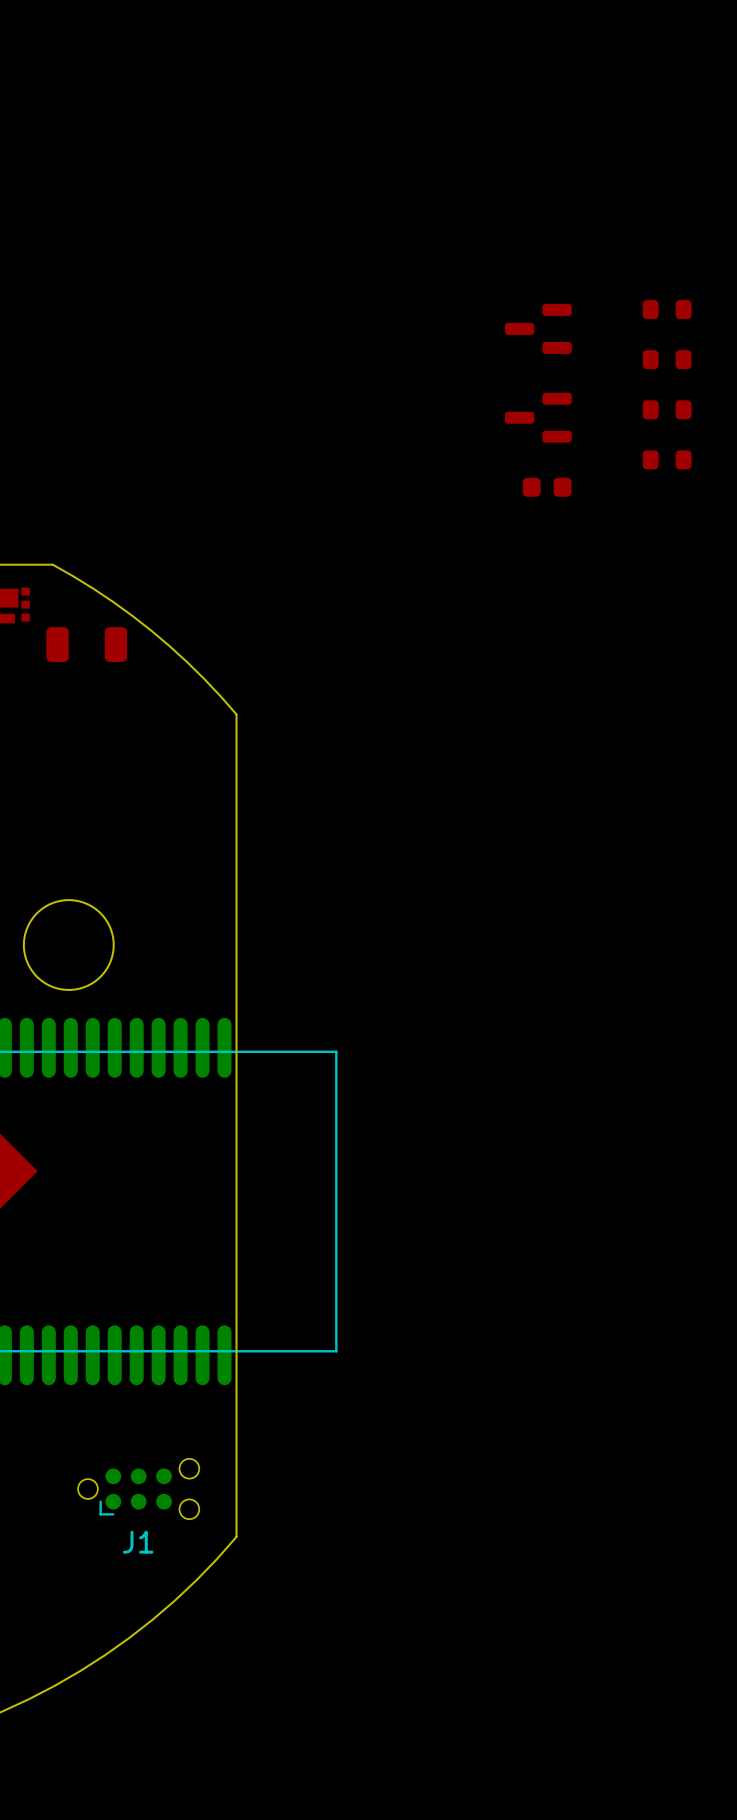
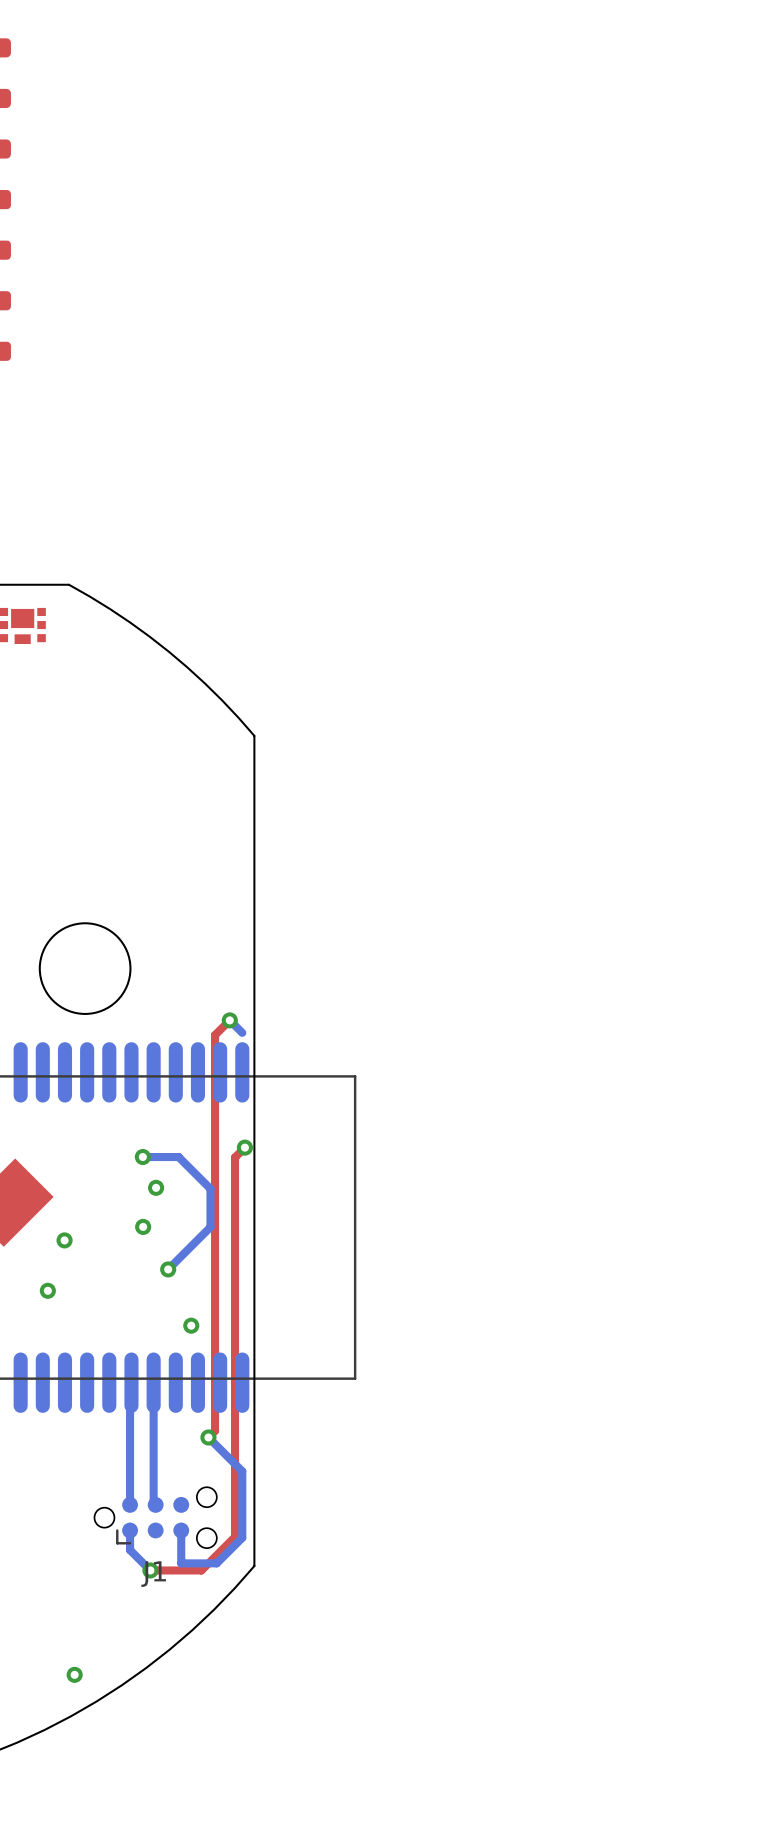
part: (667, 309) -> none
part: (538, 328) -> none
part: (667, 359) -> none
part: (667, 409) -> none
part: (538, 417) -> none
part: (667, 459) -> none
part: (547, 487) -> none
part: (86, 644) -> none
top track: none -> (229, 1020) (215, 1035) (215, 1430) (208, 1437)
bottom track: none -> (229, 1020) (242, 1032)
via: none -> (229, 1020)
top track: none -> (244, 1147) (235, 1157) (235, 1536) (201, 1570) (150, 1570)
via: none -> (244, 1147)
bottom track: none -> (142, 1157) (178, 1157) (210, 1188) (210, 1227) (168, 1269)
via: none -> (142, 1157)
via: none -> (156, 1187)
via: none -> (143, 1226)
via: none -> (64, 1240)
via: none -> (168, 1269)
via: none -> (47, 1290)
via: none -> (191, 1325)
bottom track: none -> (131, 1382) (130, 1504)
bottom track: none -> (153, 1382) (153, 1502) (155, 1504)
bottom track: none -> (208, 1437) (242, 1471) (242, 1537) (216, 1563) (181, 1563) (181, 1530)
via: none -> (208, 1437)
bottom track: none -> (130, 1530) (130, 1550) (150, 1570)
via: none -> (150, 1570)
via: none -> (74, 1674)

